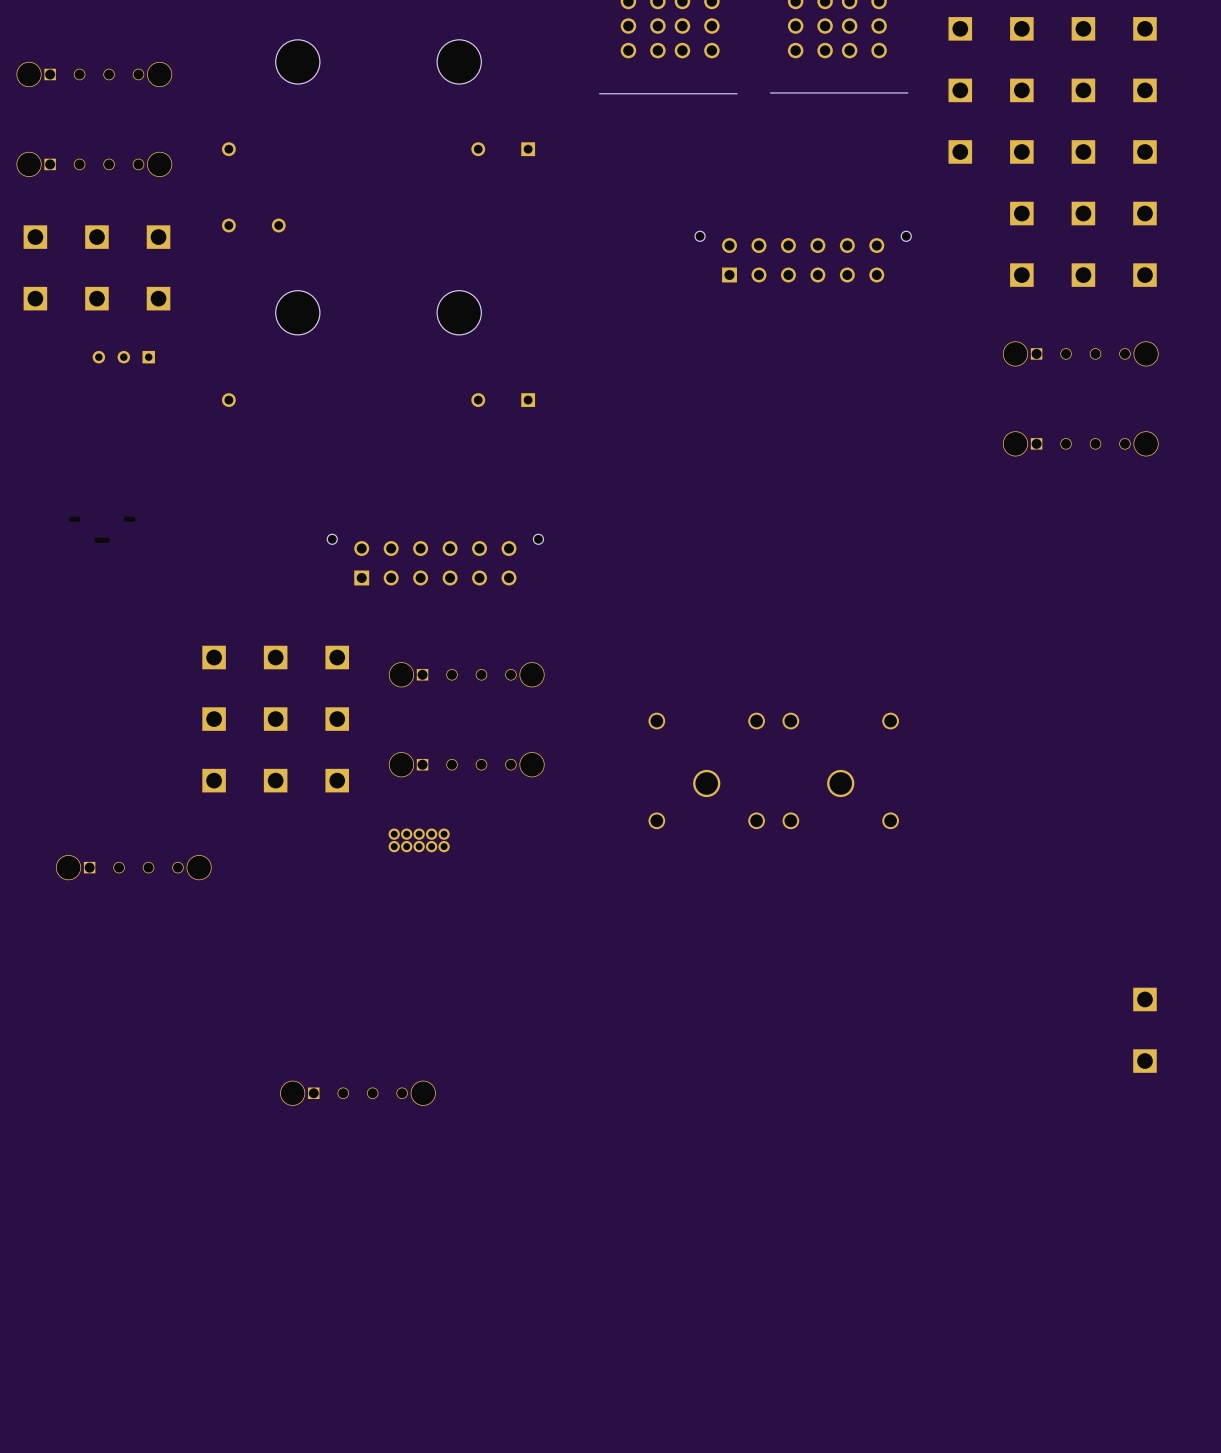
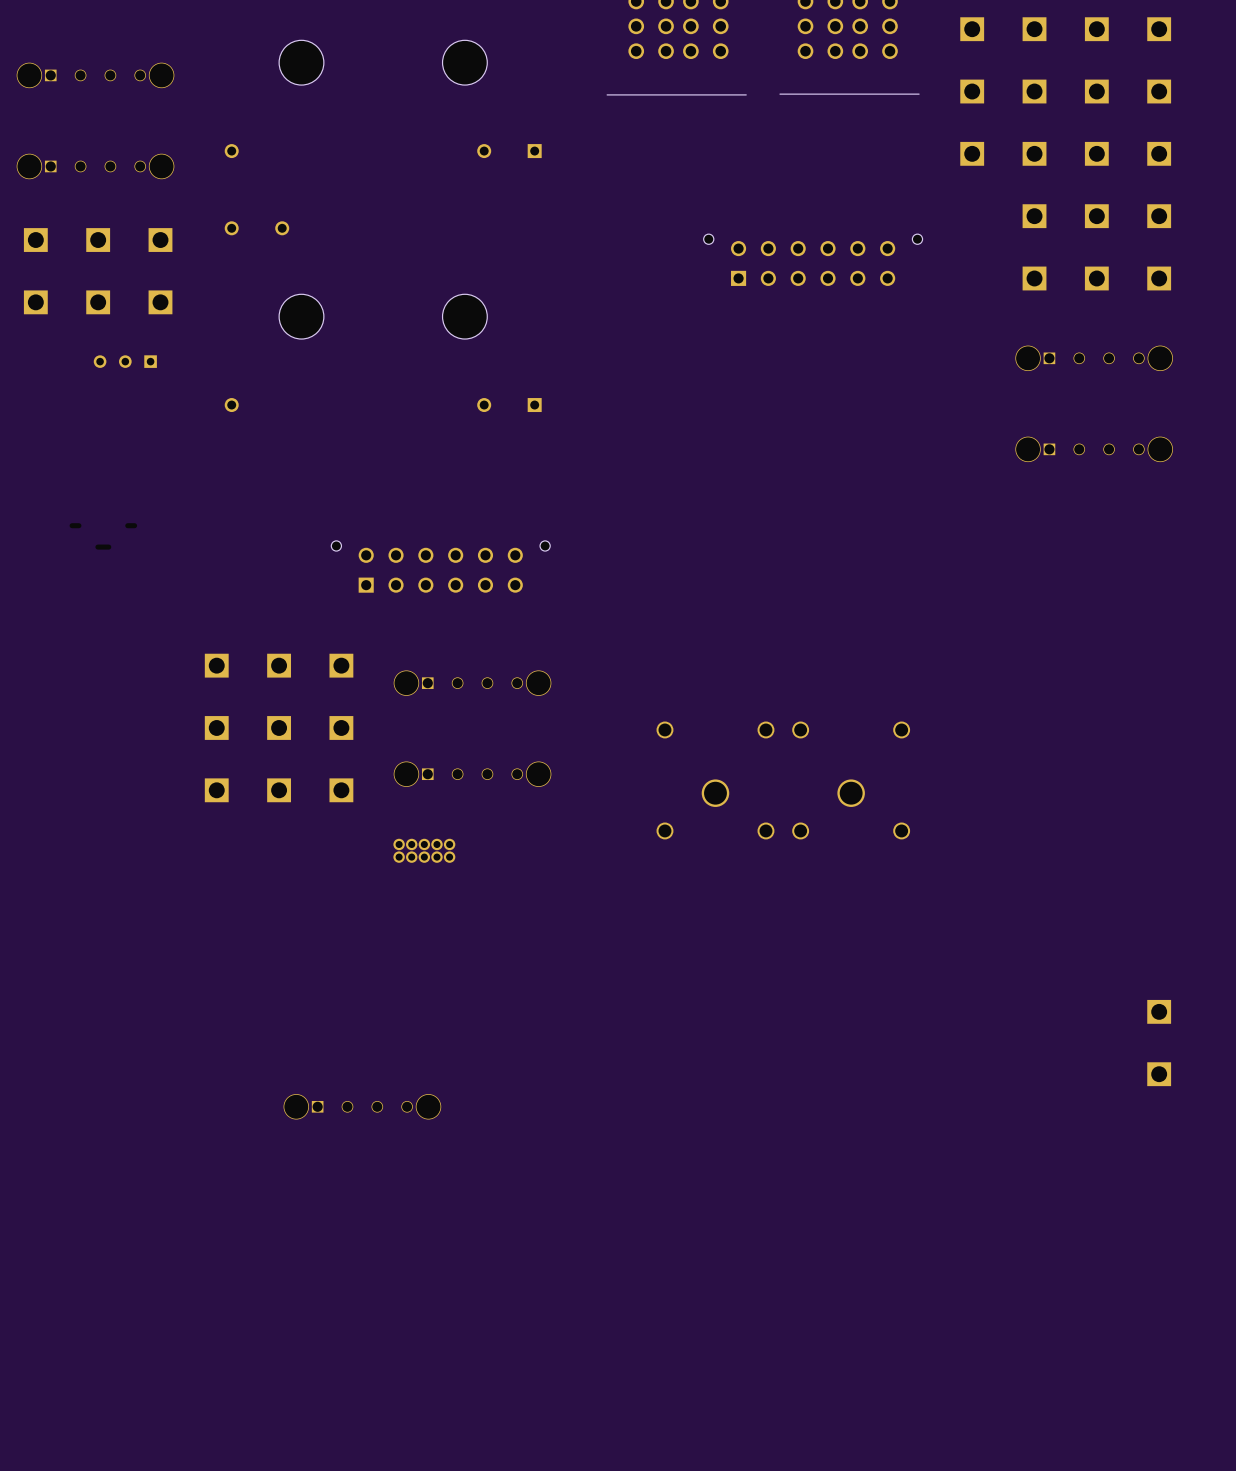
part: (133, 867) -> none

